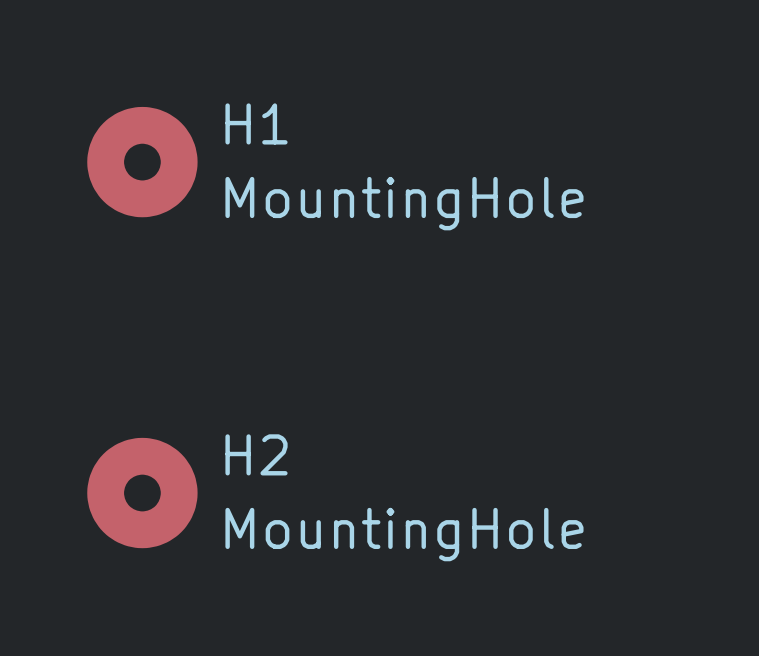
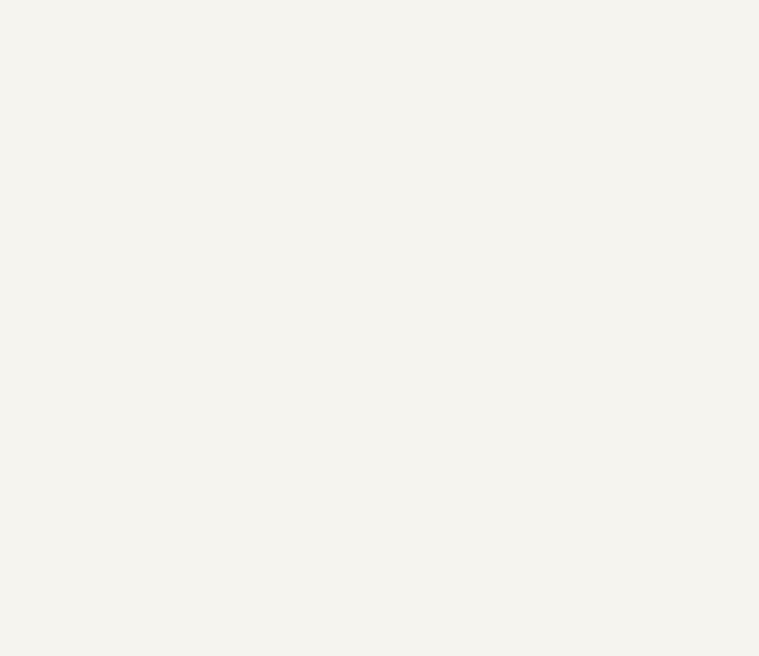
H1: MountingHole (142, 162) -> none
H2: MountingHole (142, 493) -> none

